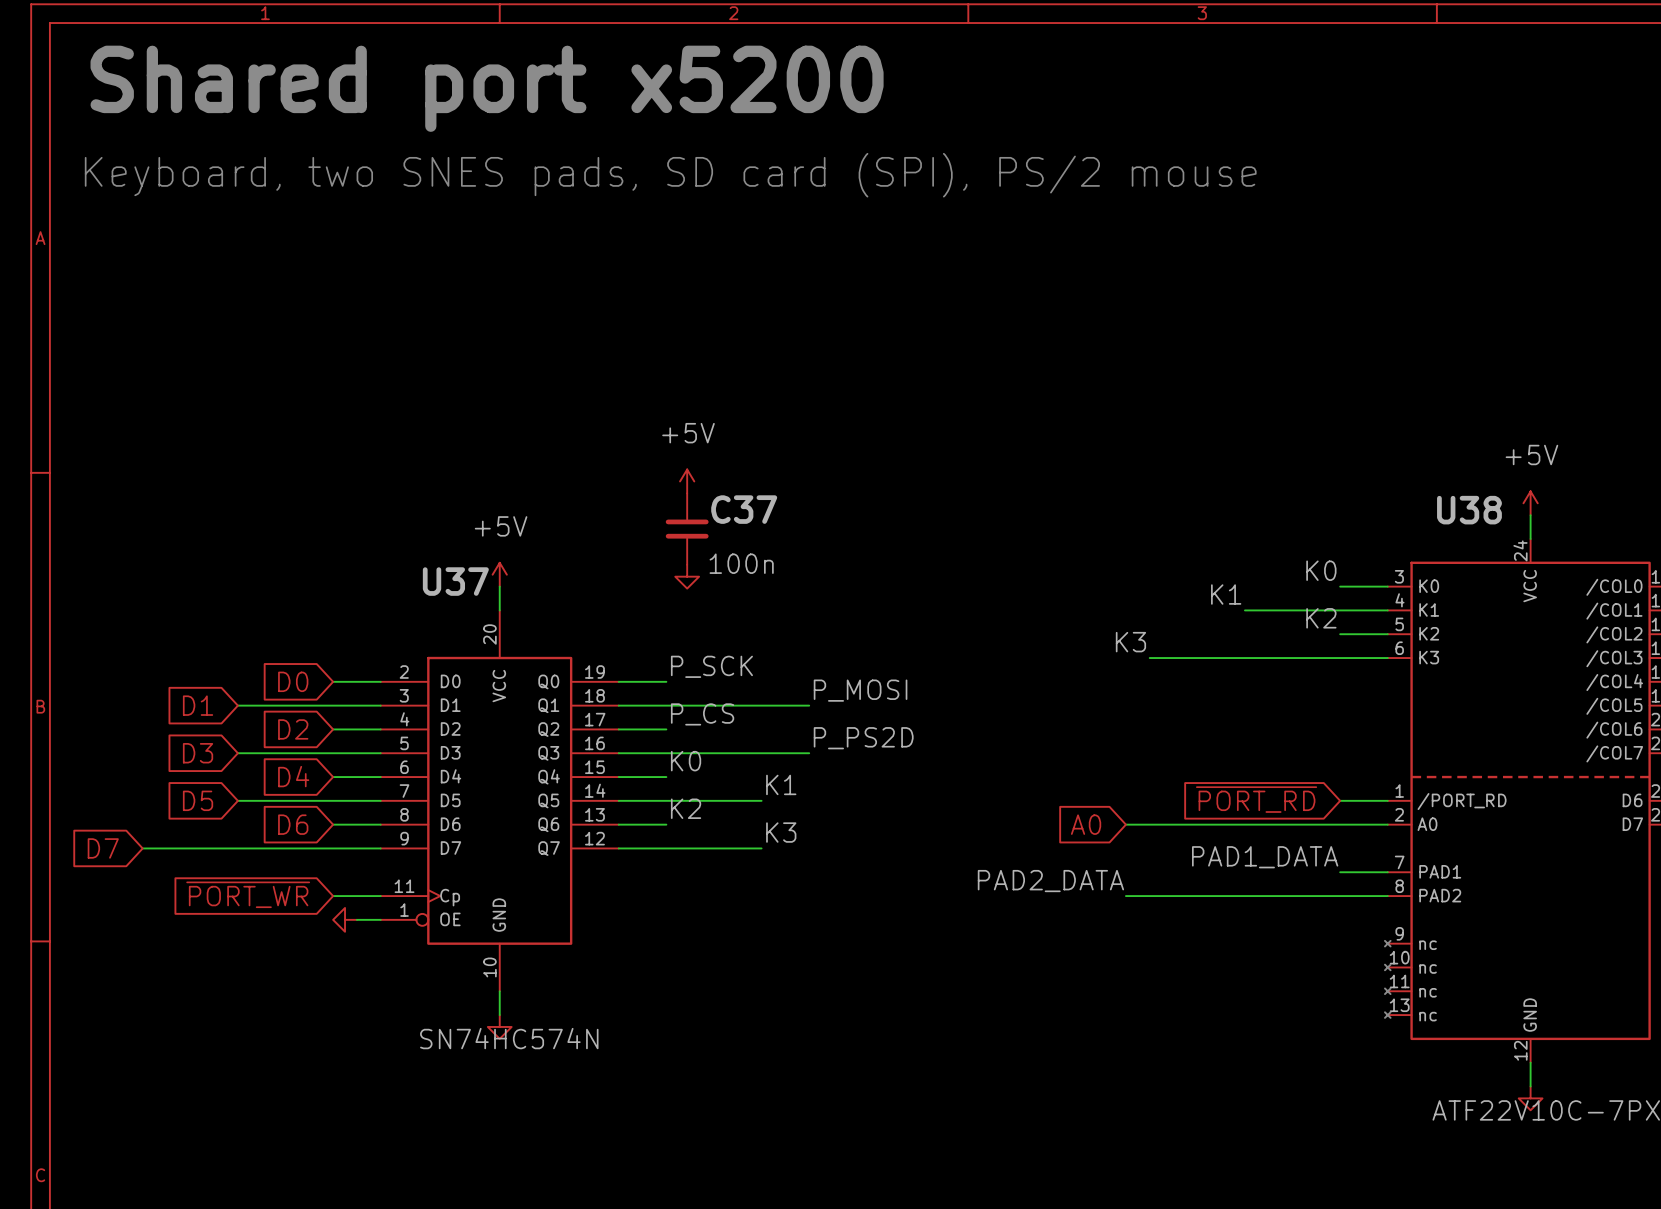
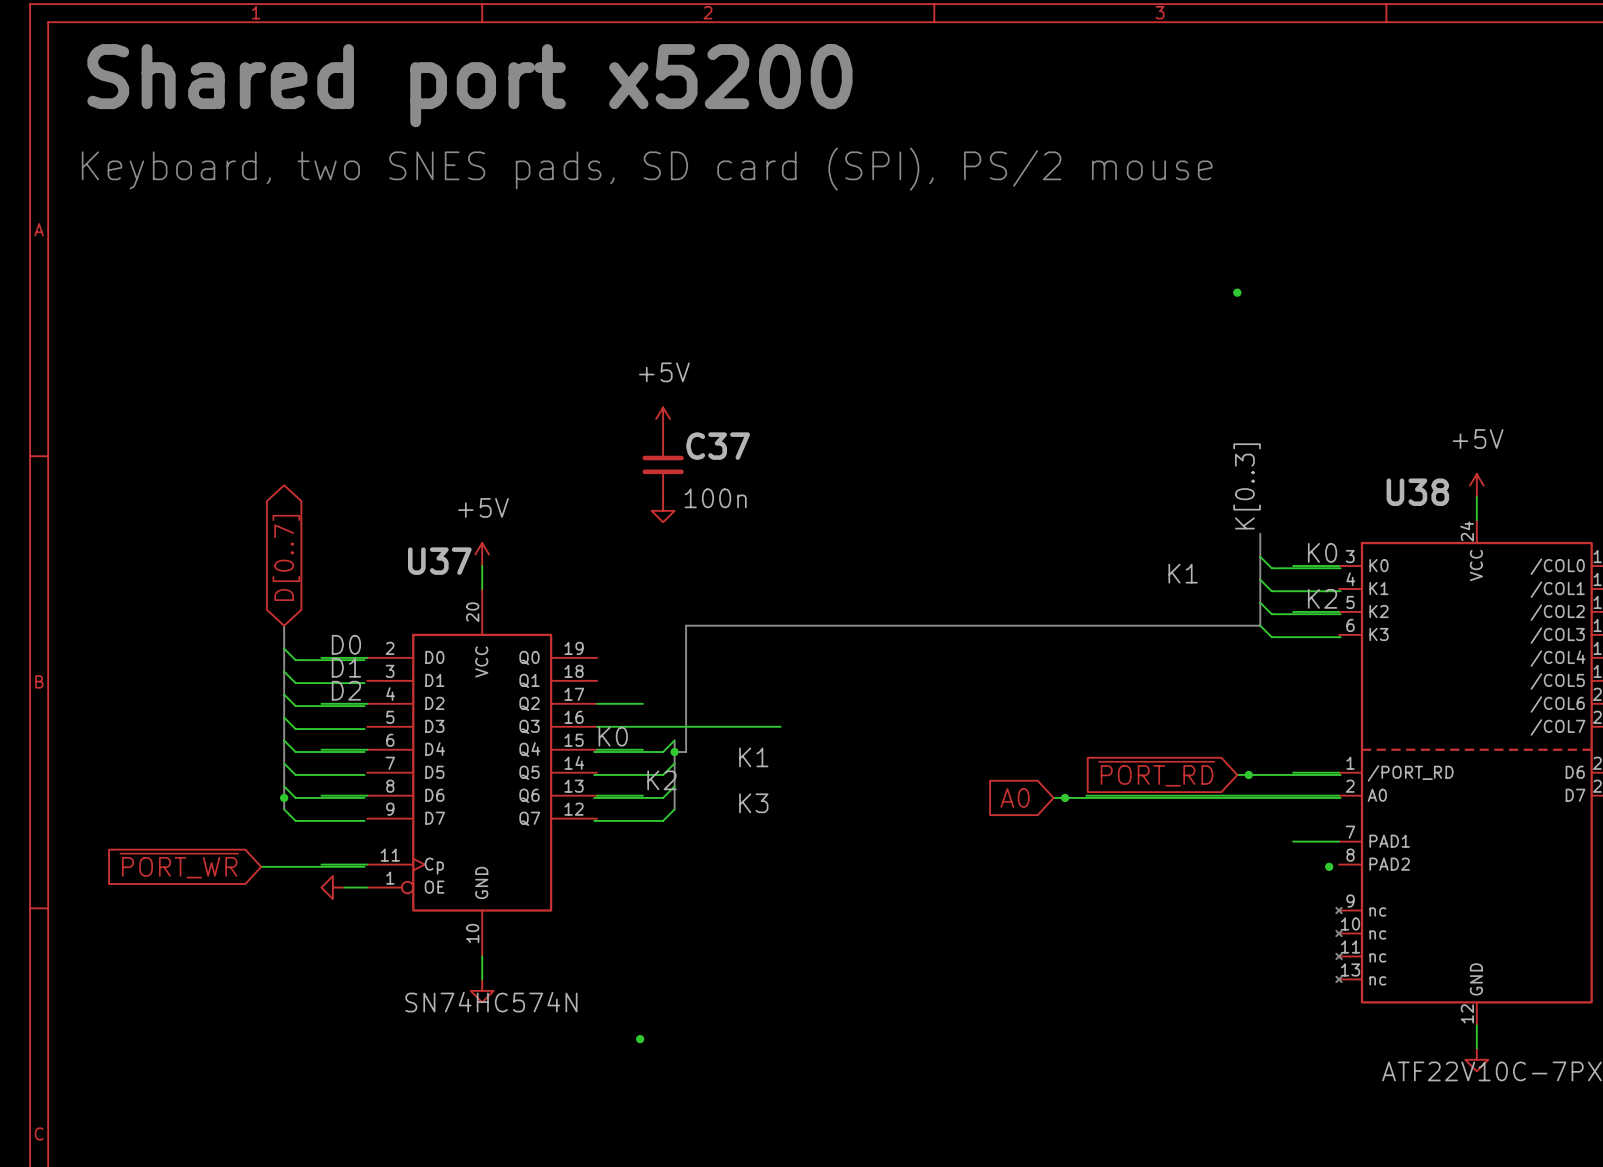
junction: none -> (1237, 292)
power symbol position: +5V (687, 481) -> +5V (663, 418)
label: none -> K[0..3] (1247, 486)
C37 position: (687, 529) -> (663, 464)
bus: none -> (1260, 533) (1260, 625) (686, 625) (686, 752) (674, 752)
label position: K0 (1321, 570) -> K0 (1322, 552)
power symbol position: (687, 576) -> (663, 510)
wire: none -> (1260, 556) (1271, 568) (1340, 568)
global label: none -> D[0..7] (286, 557)
wire: none -> (1260, 579) (1271, 591) (1340, 591)
wire: (1244, 610) (1387, 610) -> none
label position: K2 (1321, 618) -> K2 (1322, 598)
wire: none -> (1260, 602) (1271, 614) (1340, 614)
label: K3 (1130, 642) -> none
bus: none -> (284, 625) (284, 809)
wire: none -> (1260, 625) (1271, 637) (1340, 637)
wire: (1149, 658) (1387, 658) -> none
label: P_SCK (711, 666) -> none
label: none -> D0 (346, 644)
wire: none -> (284, 648) (295, 660) (364, 660)
global label: D0 (293, 681) -> none
wire: (618, 681) (666, 681) -> none
label: P_MOSI (860, 690) -> none
label: none -> D1 (346, 667)
wire: none -> (284, 671) (295, 683) (364, 683)
global label: D1 (198, 705) -> none
wire: (237, 705) (380, 705) -> none
wire: (618, 705) (809, 705) -> none
label: P_CS (702, 714) -> none
label: none -> D2 (346, 690)
wire: none -> (284, 694) (295, 706) (364, 706)
global label: D2 (293, 729) -> none
label: P_PS2D (863, 738) -> none
wire: none -> (284, 717) (295, 729) (364, 729)
global label: D3 (198, 753) -> none
wire: (237, 753) (380, 753) -> none
label position: K0 (686, 761) -> K0 (613, 736)
wire: none -> (284, 740) (295, 752) (364, 752)
wire: none -> (674, 740) (663, 752) (594, 752)
bus: none -> (674, 740) (674, 809)
global label: D4 (293, 776) -> none
junction: none -> (674, 752)
wire: none -> (284, 763) (295, 774) (364, 774)
wire: none -> (674, 763) (663, 774) (594, 774)
global label position: ~{PORT_RD} (1256, 799) -> ~{PORT_RD} (1156, 773)
global label: D5 (198, 800) -> none
wire: (237, 800) (380, 800) -> none
wire: (618, 800) (761, 800) -> none
wire: none -> (1237, 774) (1340, 774)
junction: none -> (1248, 774)
wire: none -> (284, 786) (295, 797) (364, 797)
wire: none -> (674, 786) (663, 797) (594, 797)
global label: D6 (293, 824) -> none
global label position: A0 (1086, 824) -> A0 (1015, 797)
junction: none -> (284, 797)
wire: none -> (1053, 797) (1340, 797)
junction: none -> (1065, 797)
wire: none -> (284, 809) (295, 820) (364, 820)
wire: none -> (674, 809) (663, 820) (594, 820)
global label: D7 (103, 848) -> none
wire: (142, 848) (380, 848) -> none
wire: (618, 848) (761, 848) -> none
label: PAD1_DATA (1265, 857) -> none
label: PAD2_DATA (1050, 881) -> none
global label position: ~{PORT_WR} (248, 894) -> ~{PORT_WR} (179, 865)
wire: (1125, 896) (1387, 896) -> none
wire: none -> (261, 866) (364, 866)
junction: none -> (1329, 866)
junction: none -> (640, 1039)

